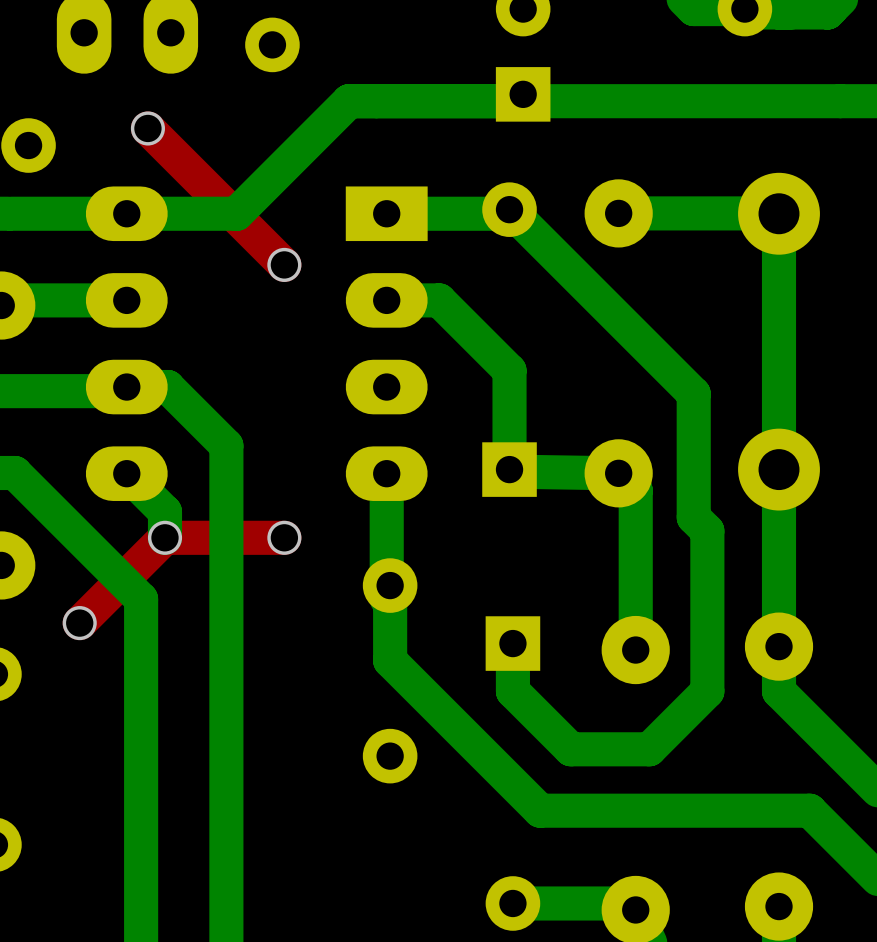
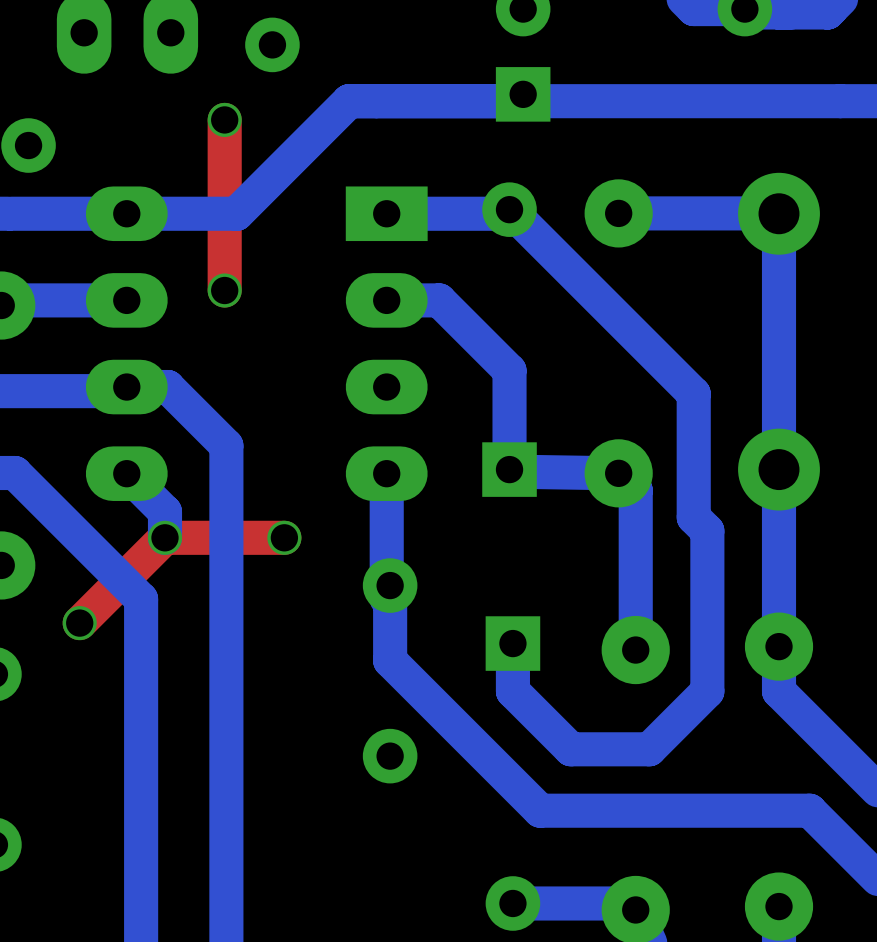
top track: none -> (224, 119) (224, 290)
top track: (147, 128) (284, 264) -> none
via position: (147, 128) -> (224, 119)
via position: (284, 264) -> (224, 290)

